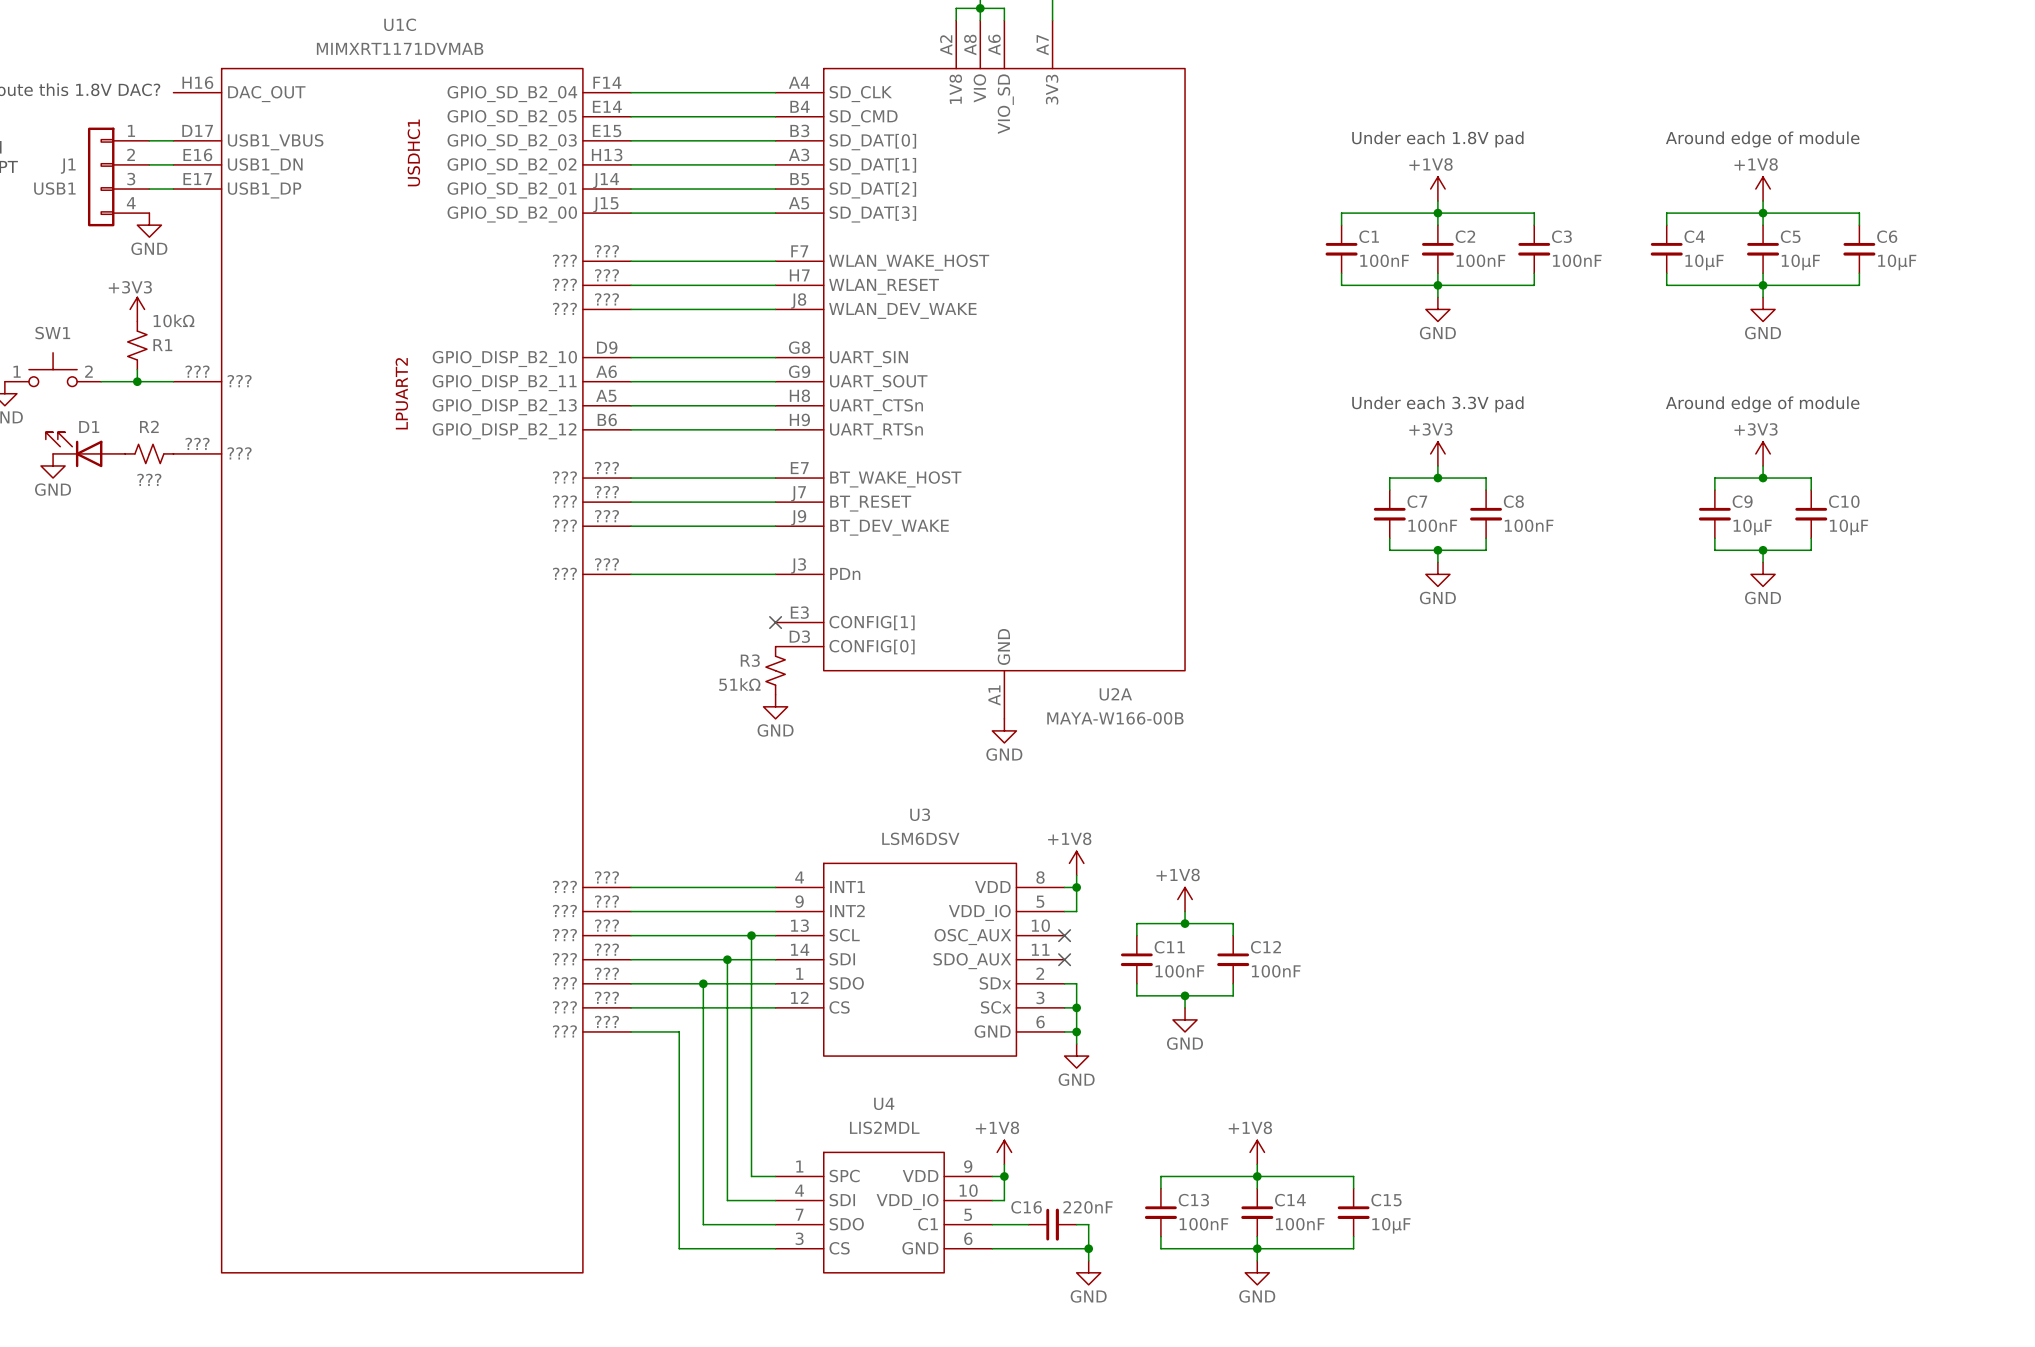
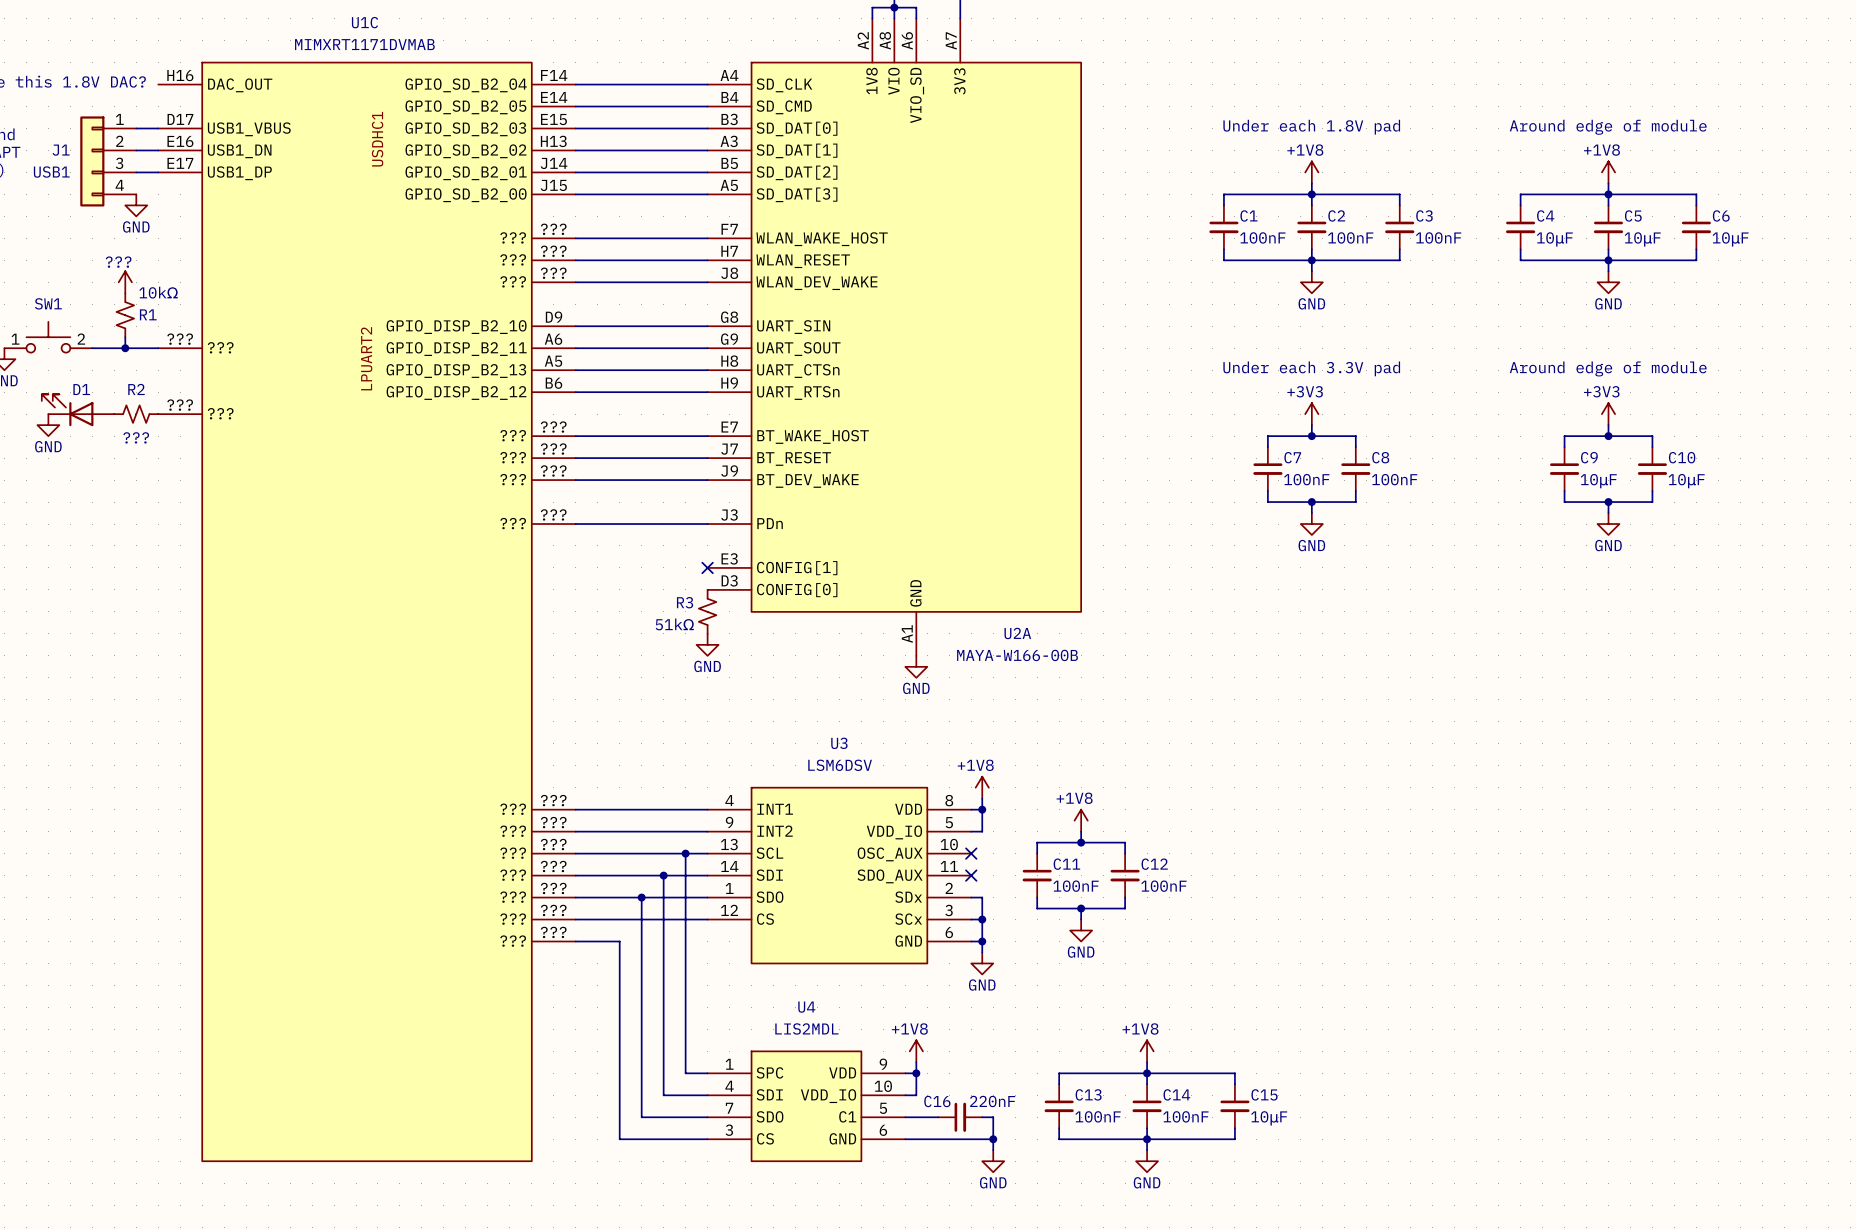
power symbol: +3V3 (137, 309) -> ??? (125, 282)

